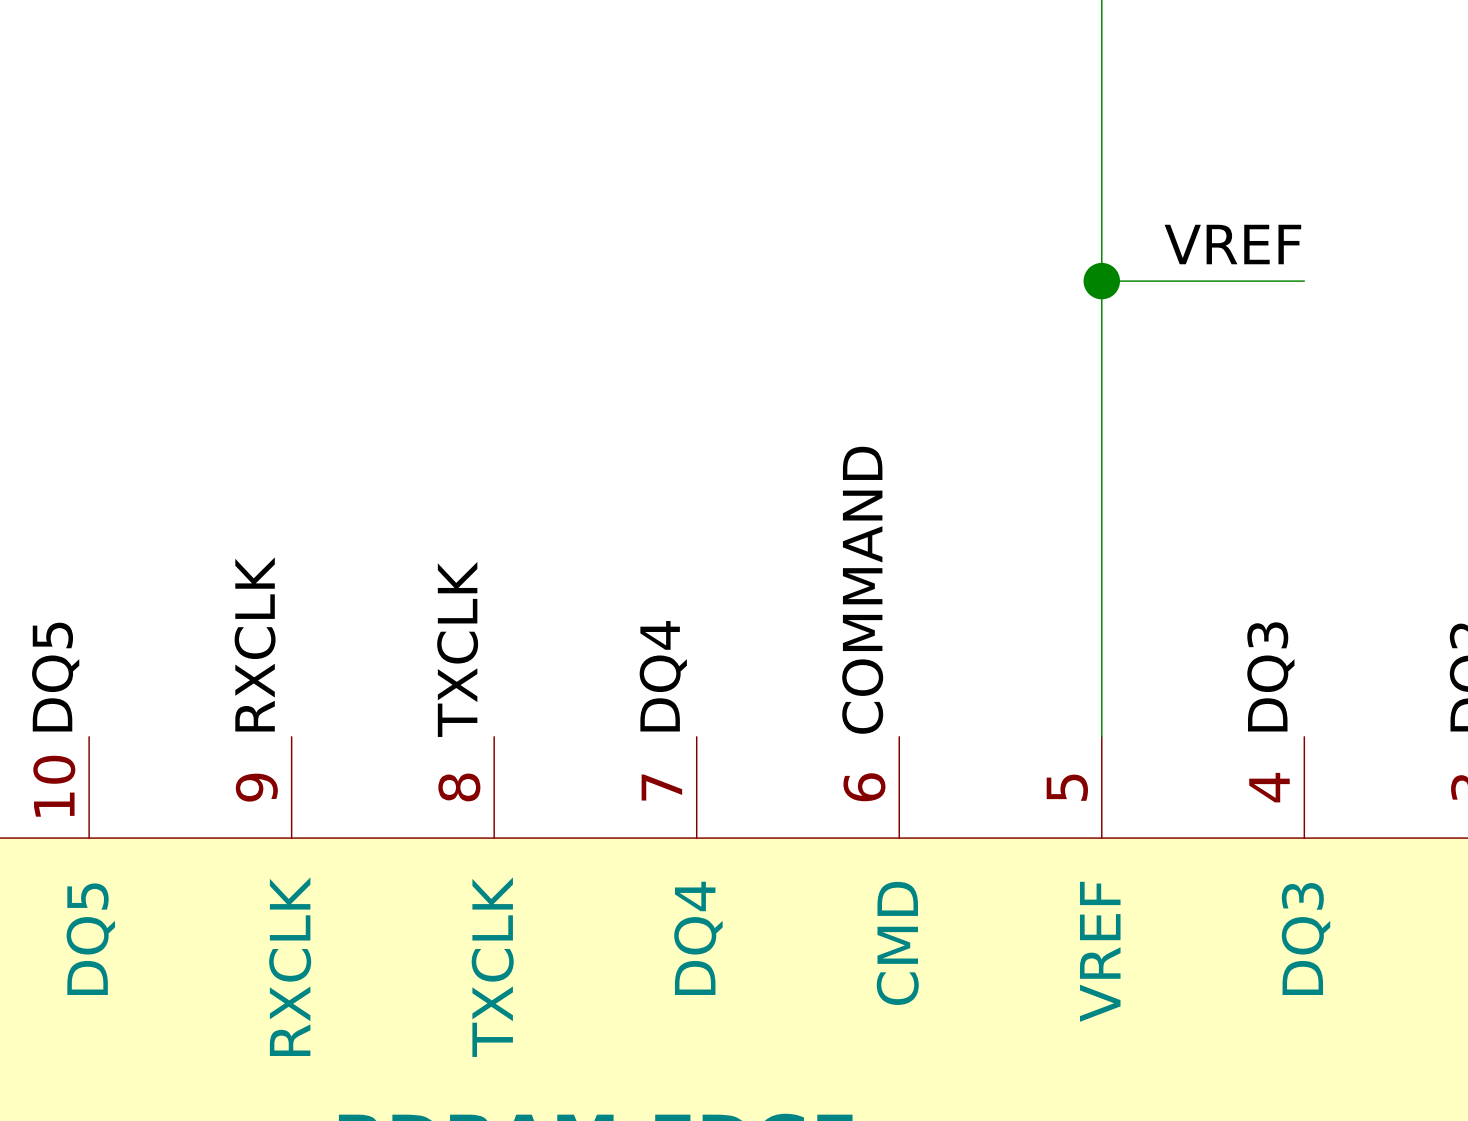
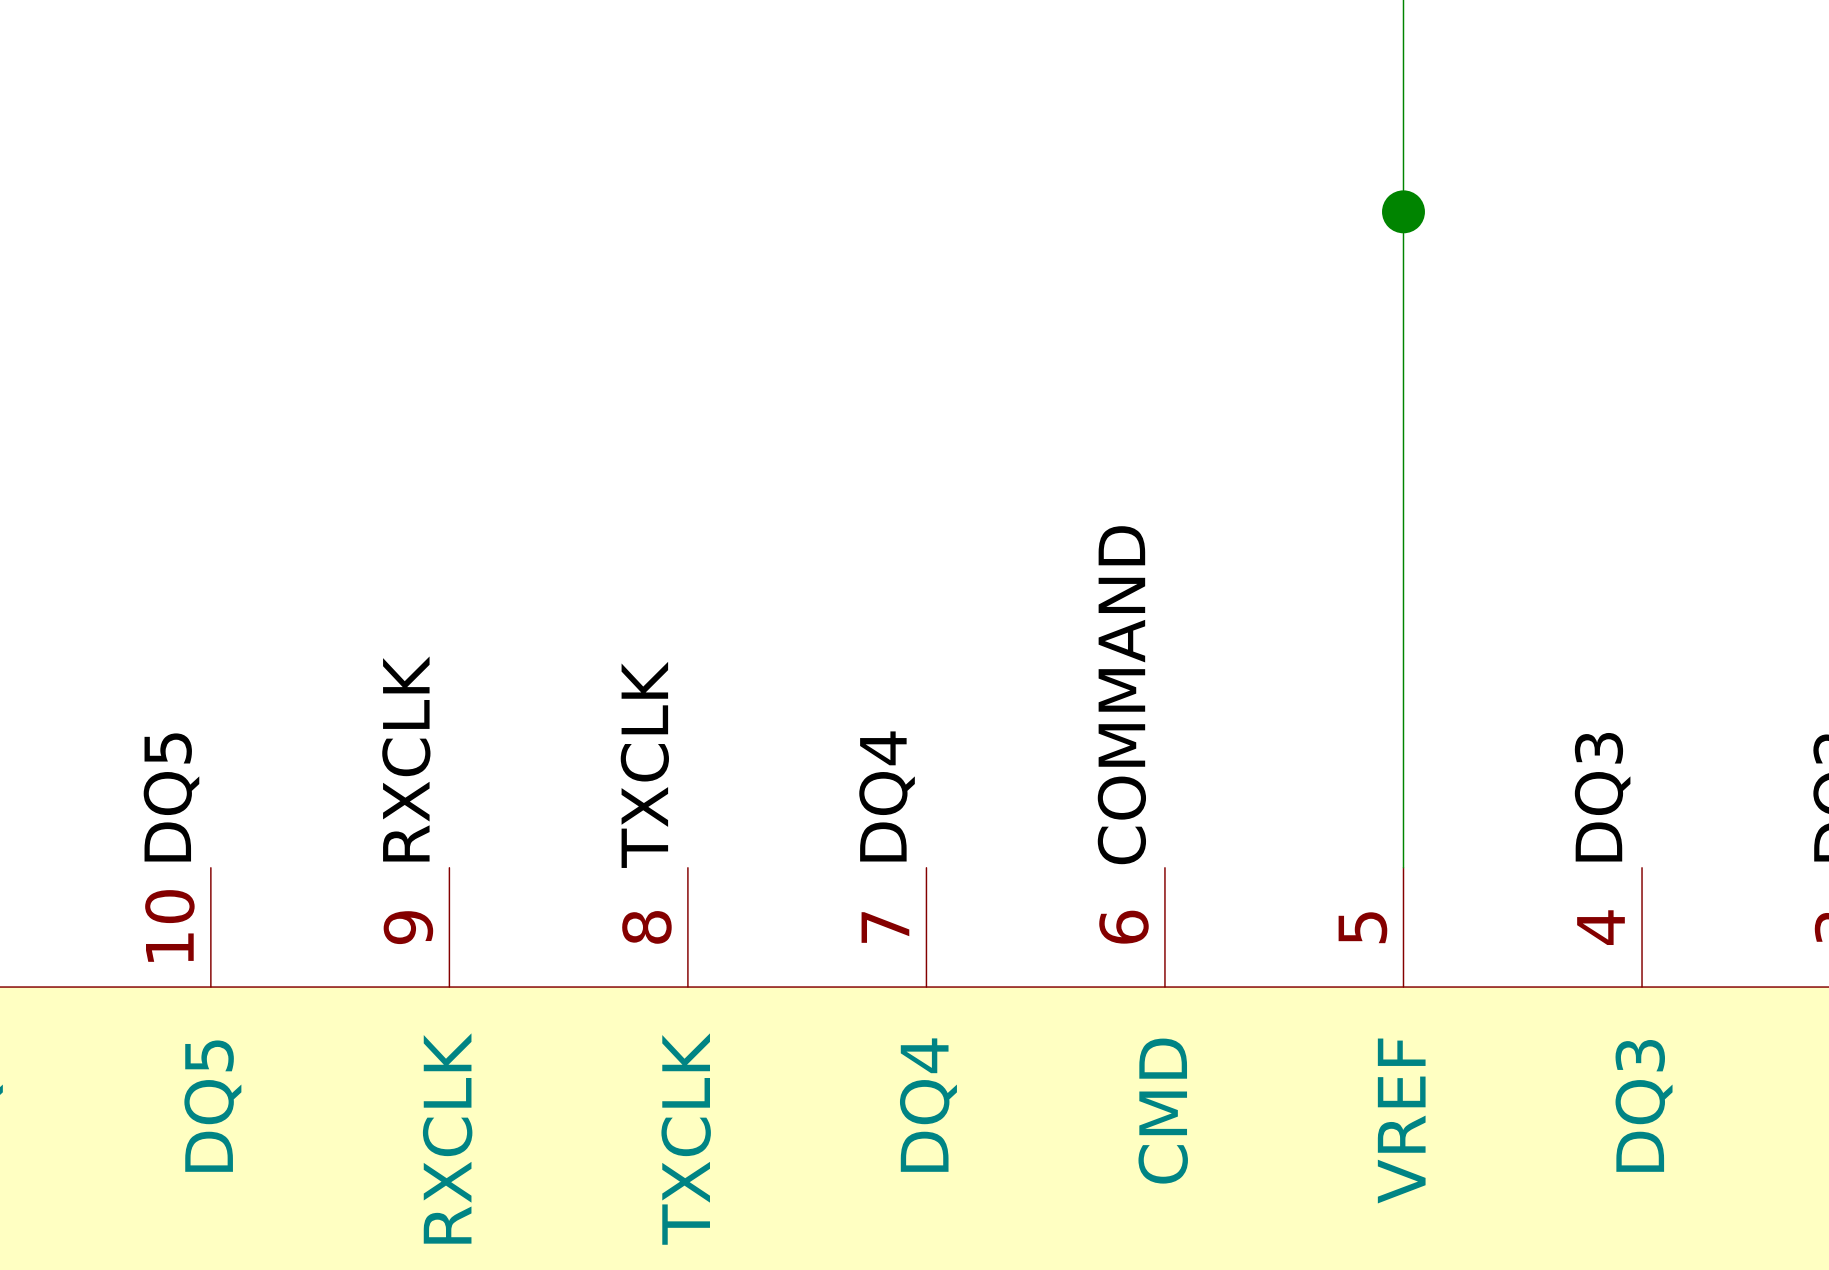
label: VREF (1232, 244) -> none
wire: (1101, 281) (1304, 281) -> none
junction position: (1101, 281) -> (1403, 211)

